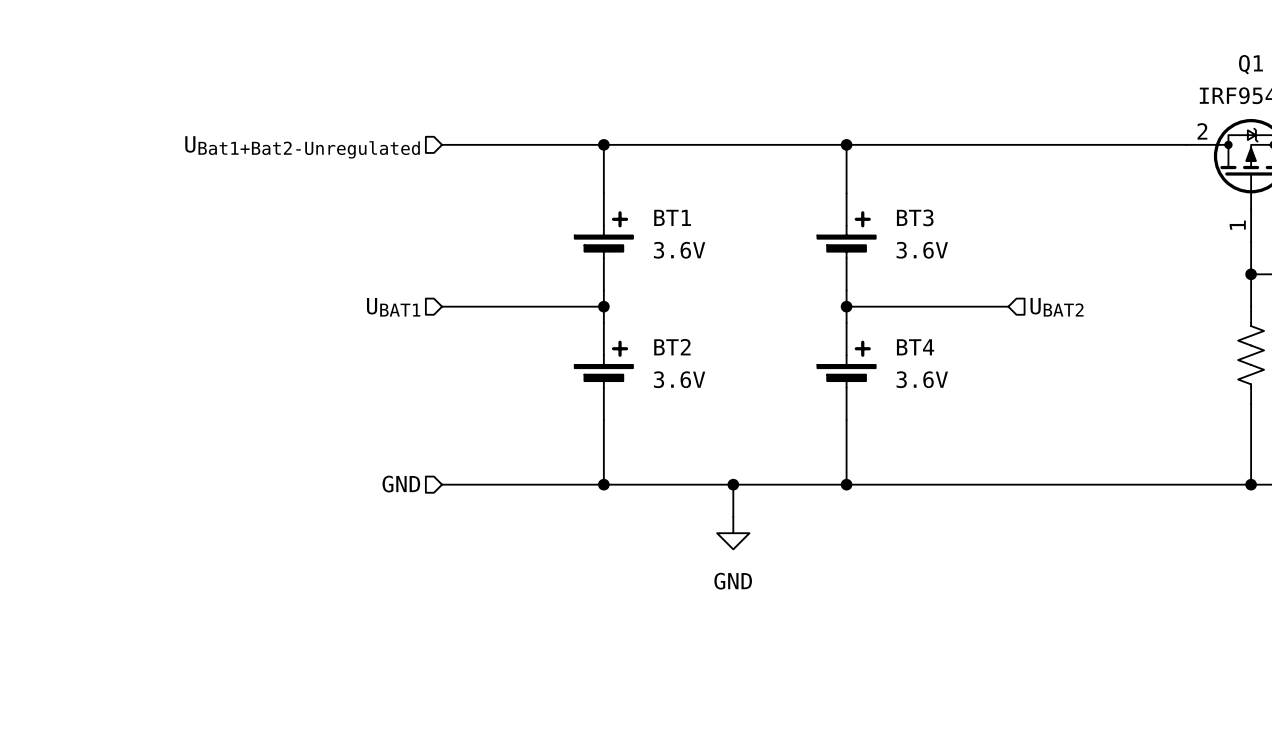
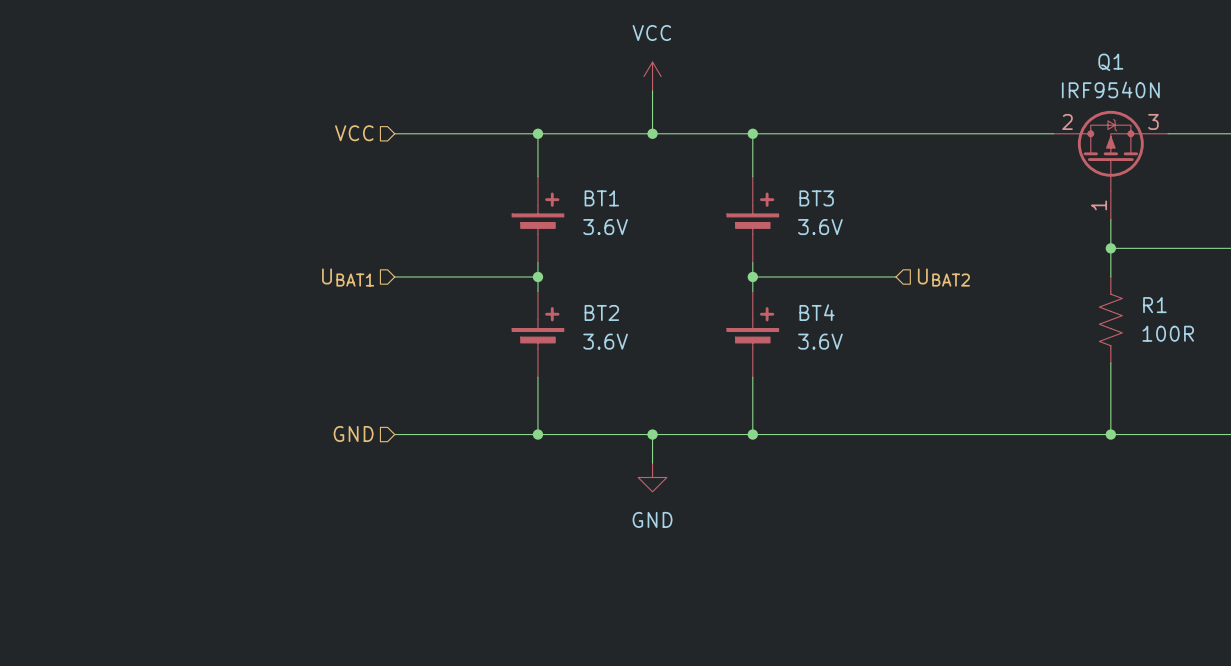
power symbol: none -> VCC (652, 76)
wire: none -> (652, 90) (652, 133)
junction: none -> (652, 133)
hierarchical label: UBat1+Bat2-Unregulated (302, 147) -> VCC (354, 133)

